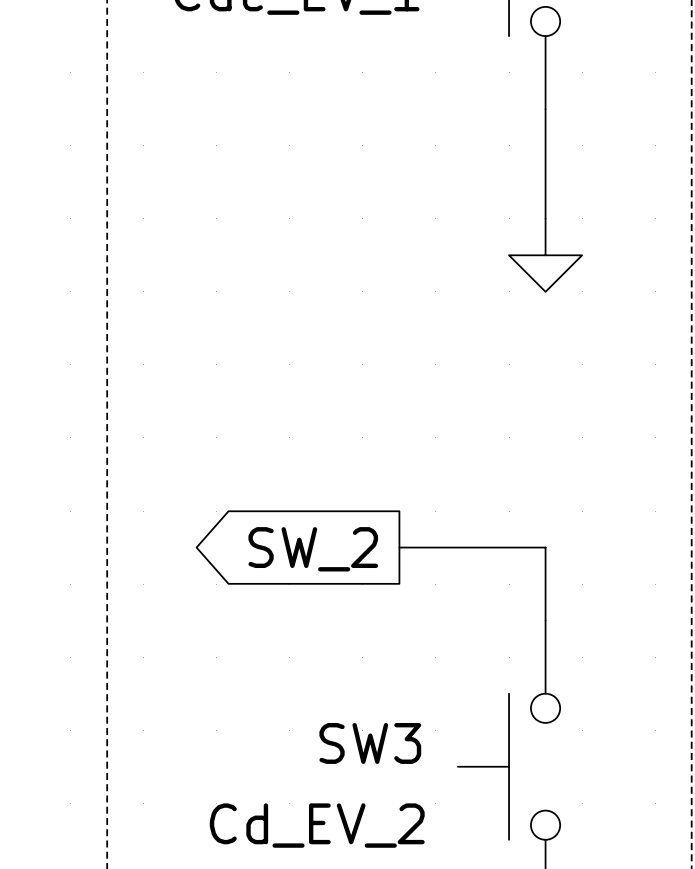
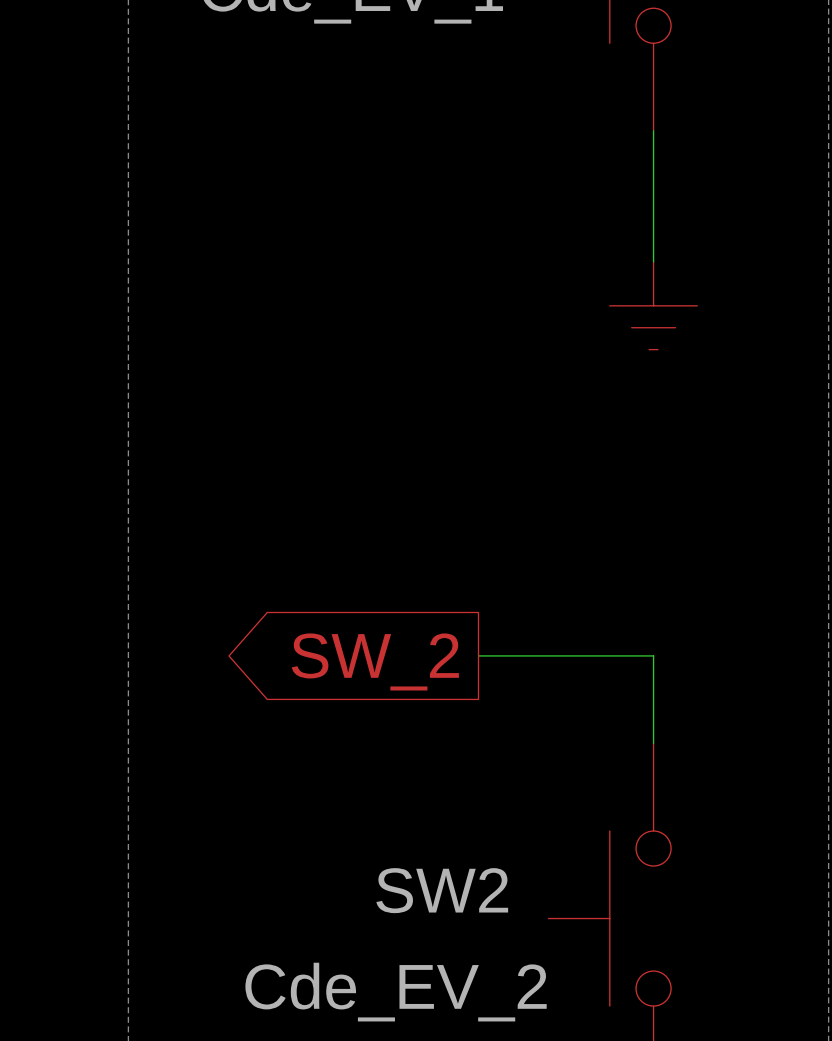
power symbol shape: [509, 218, 583, 292] -> [609, 262, 698, 350]
SW3 name: SW3 (370, 743) -> SW2 (442, 890)
SW3 value: Cd_EV_2 (317, 825) -> Cde_EV_2 (396, 992)

